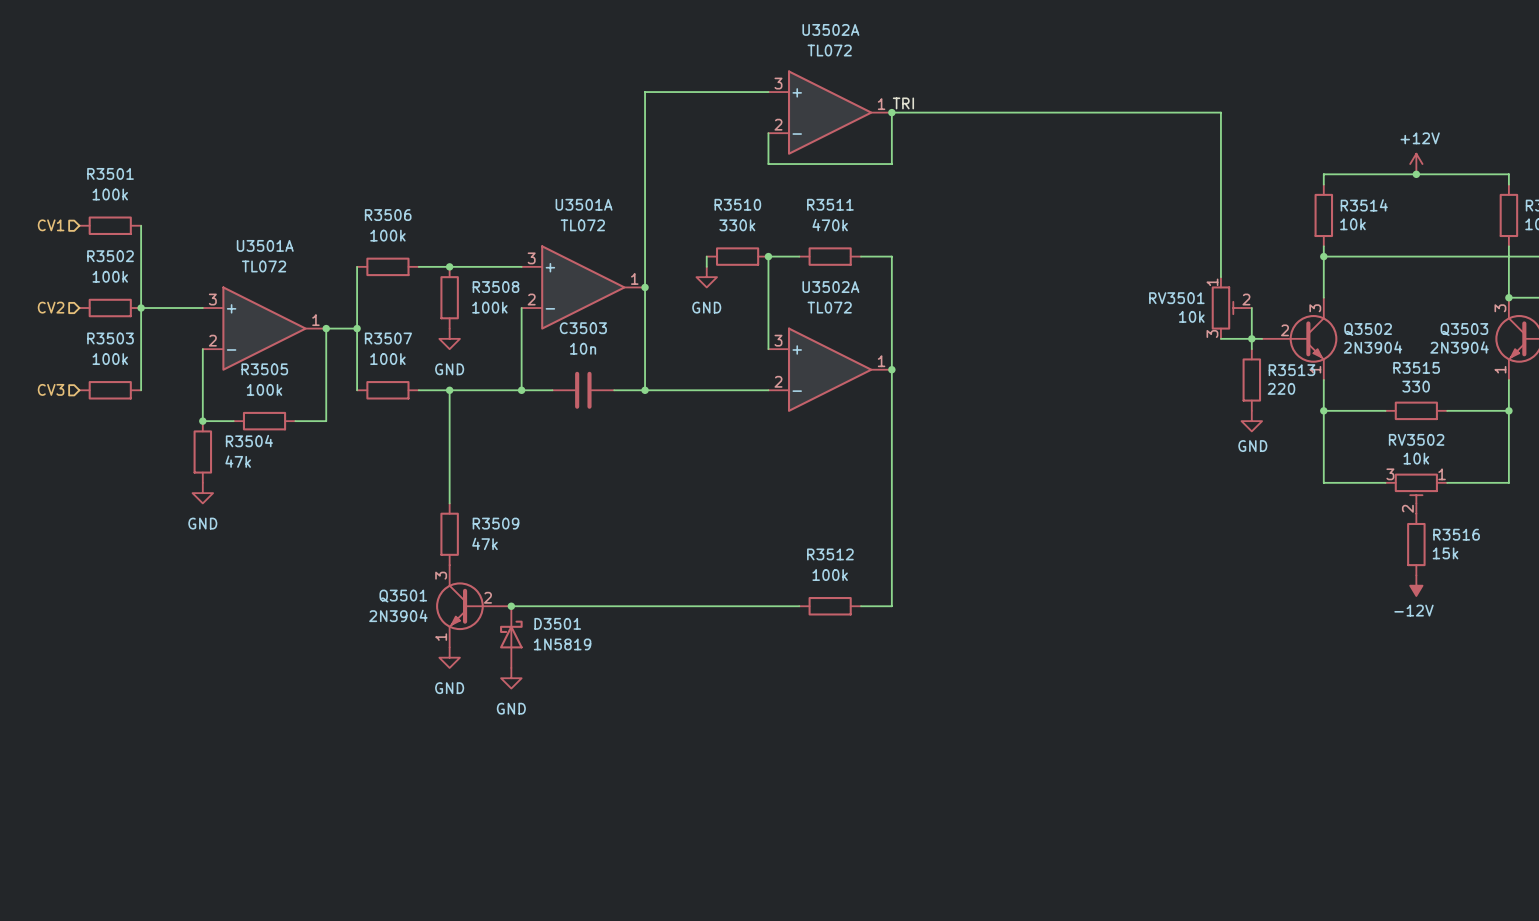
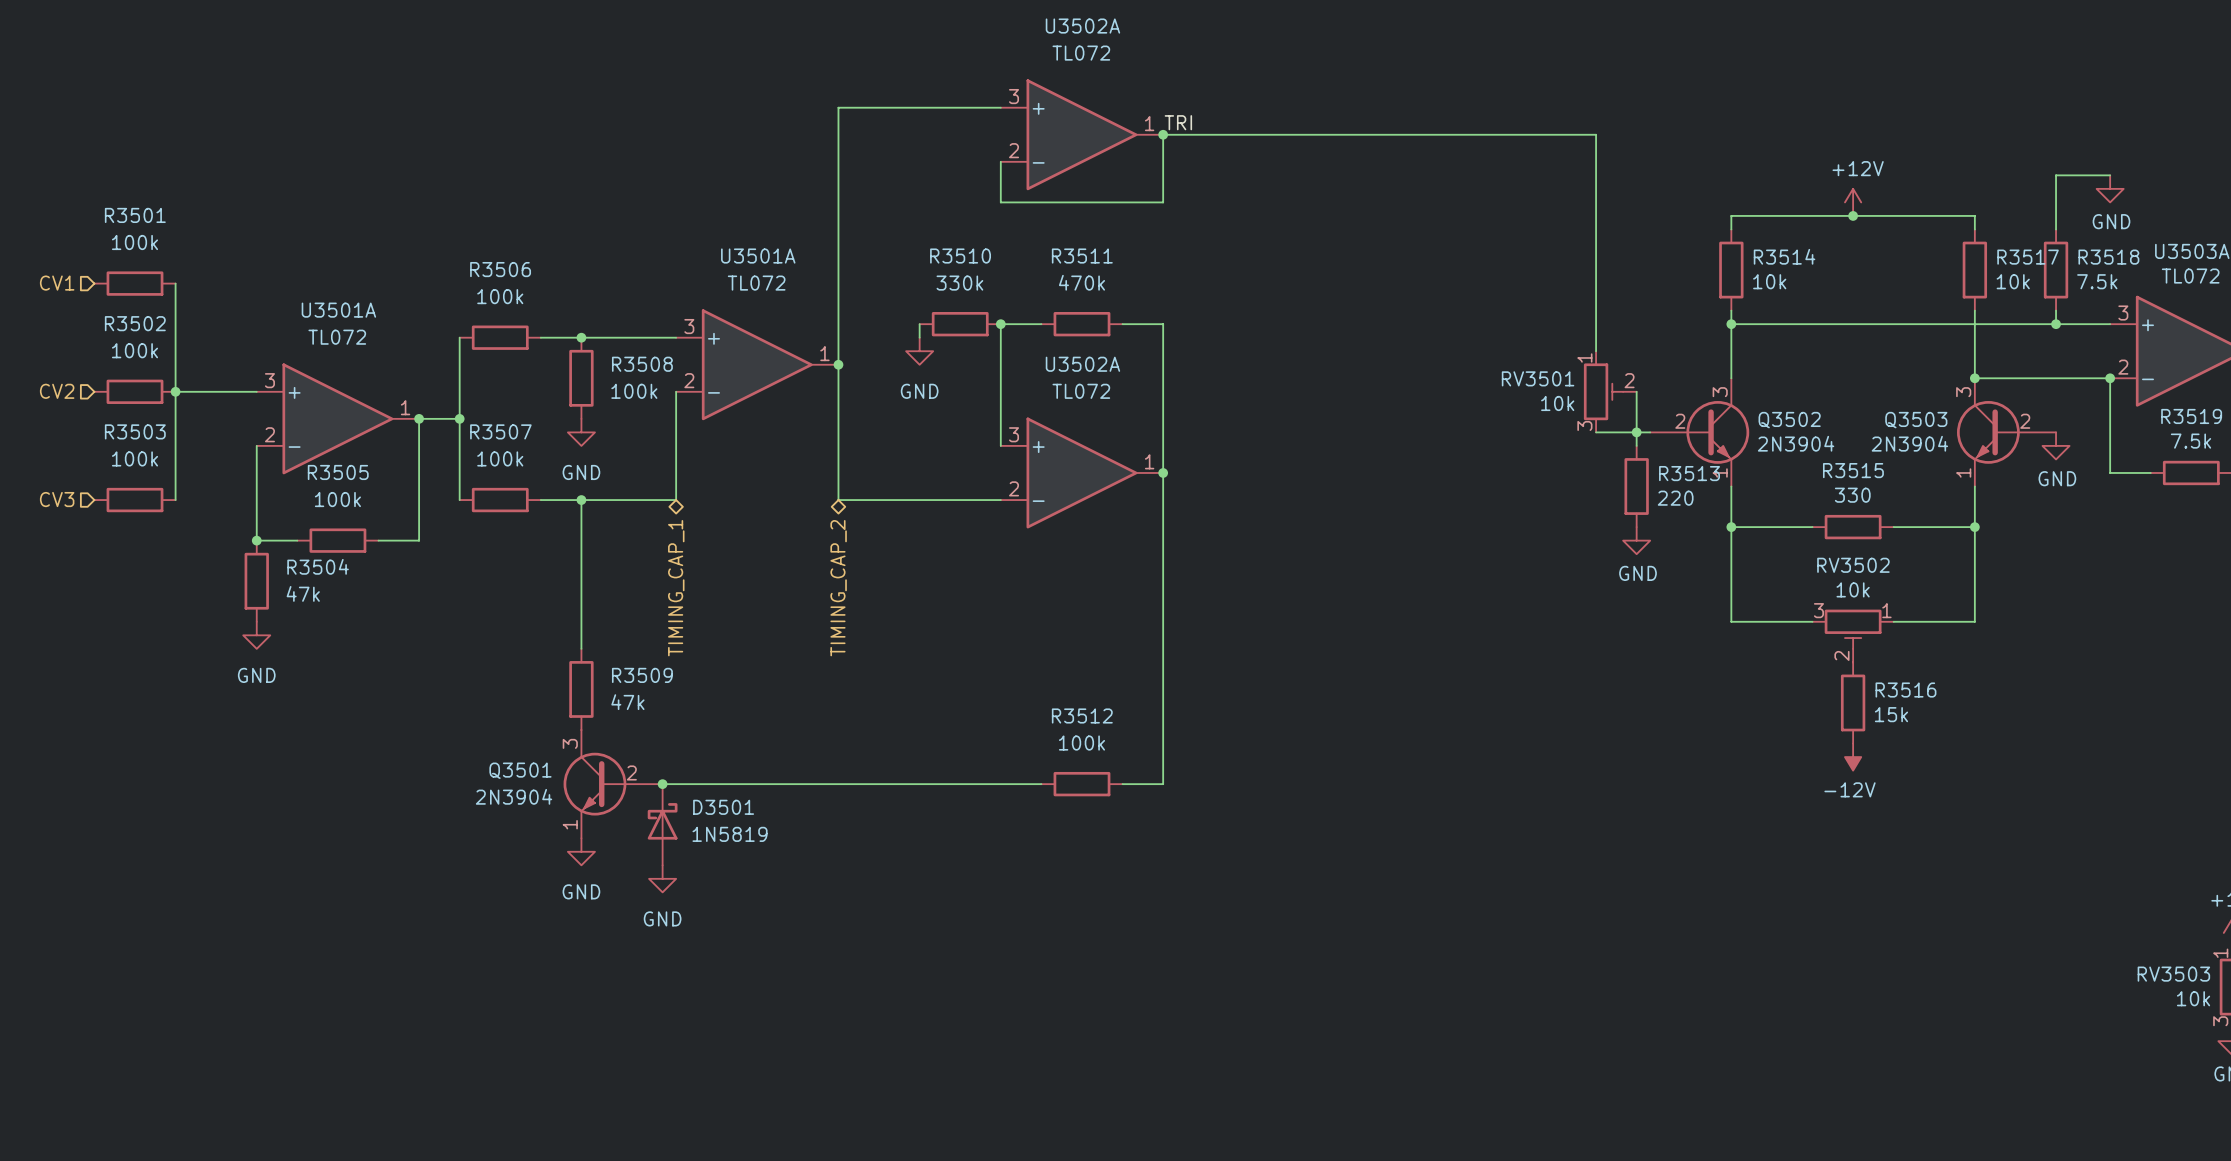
wire: (521, 390) (552, 390) -> none
junction: (521, 390) -> none
C3503: 10n (583, 390) -> none
wire: (614, 390) (645, 390) -> none
junction: (645, 390) -> none
hierarchical label: none -> TIMING_CAP_1 (676, 588)
hierarchical label: none -> TIMING_CAP_2 (838, 588)

